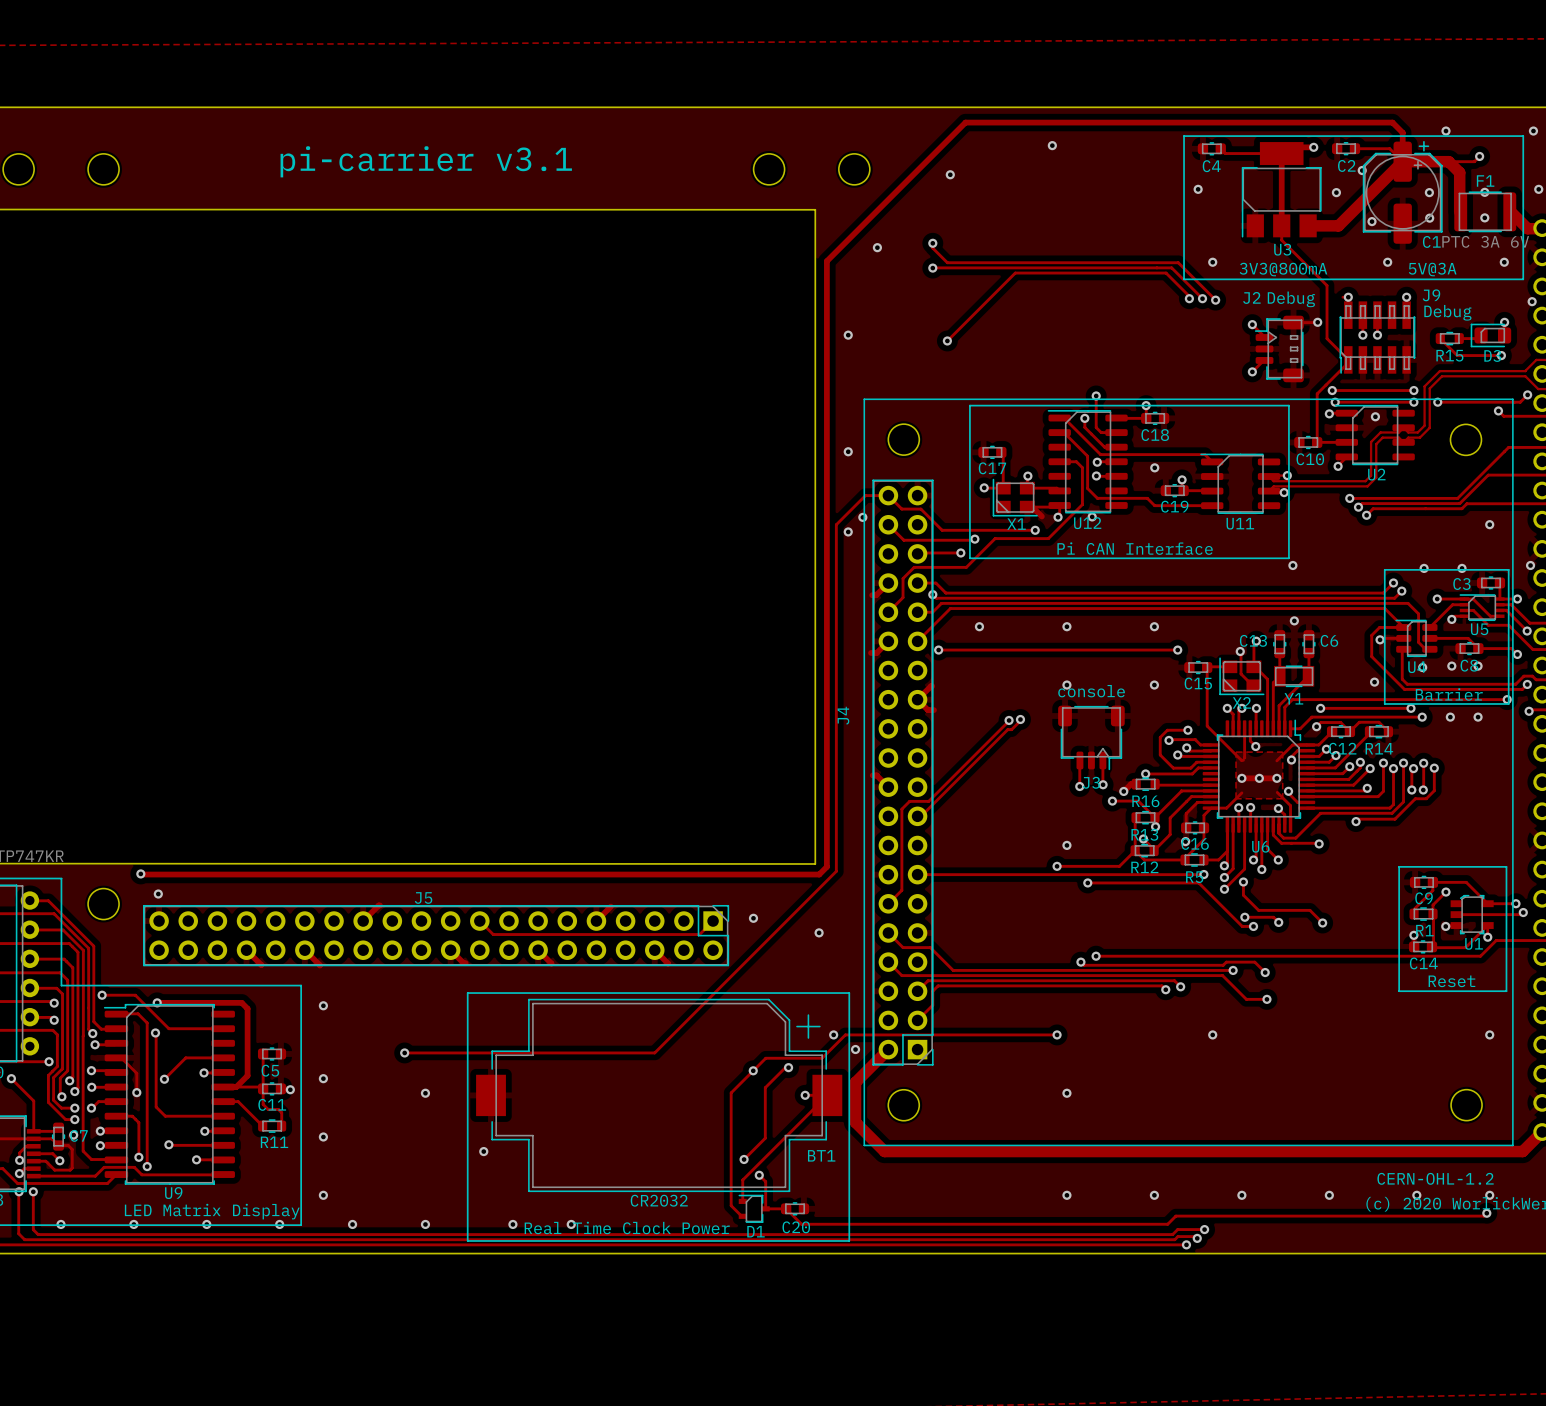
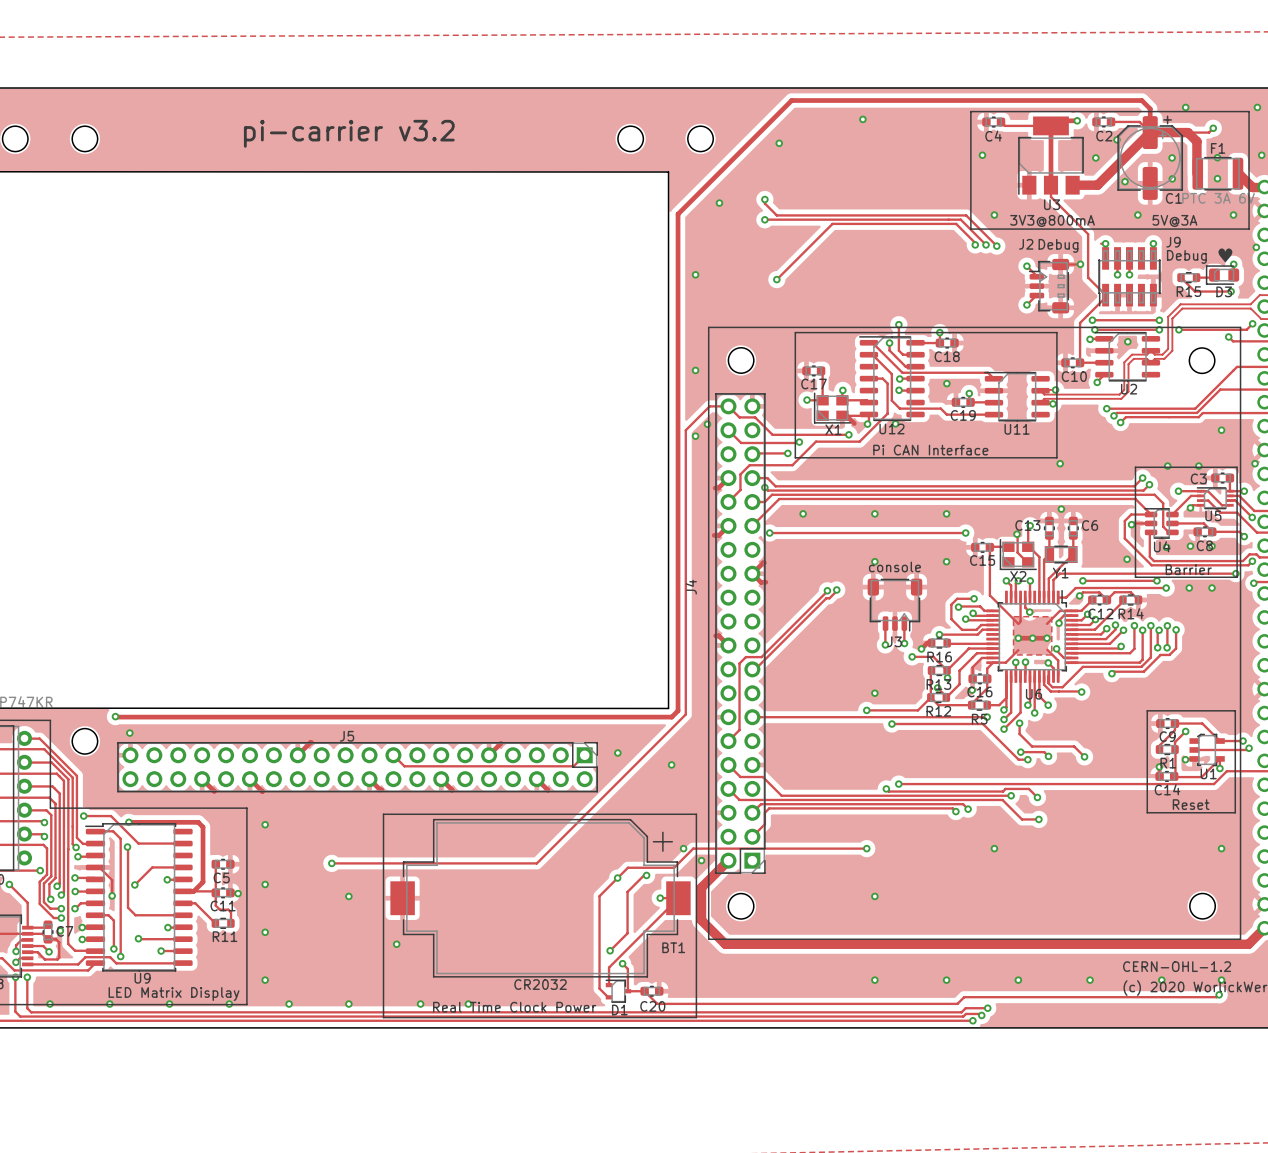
text: pi-carrier v3.1 (426, 161) -> pi-carrier v3.2 (349, 133)
text: none -> ♥ (1225, 255)

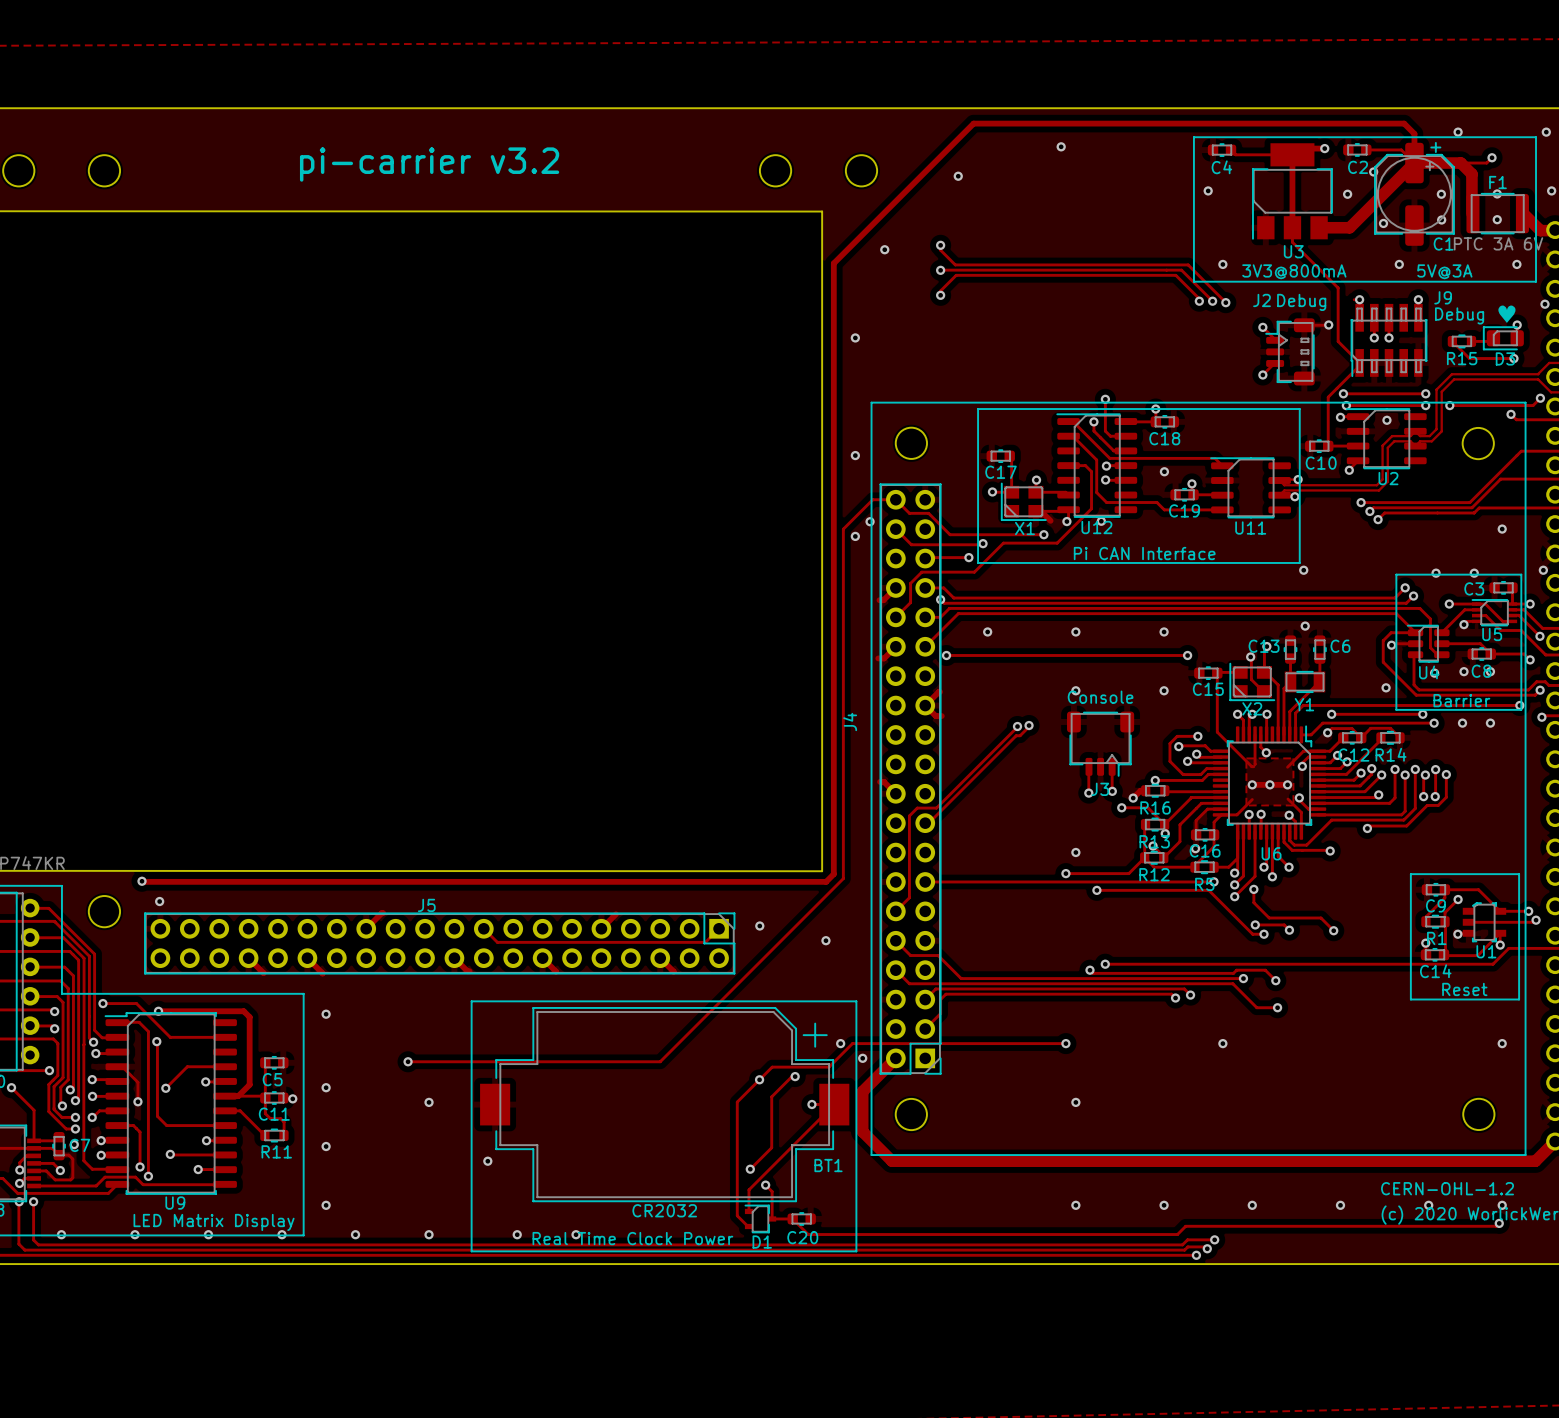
track: (832, 223) (776, 279) -> (1023, 275) (956, 275) (940, 290) (940, 295)
via position: (776, 279) -> (940, 295)
J3 value: console (894, 566) -> Console (1100, 697)

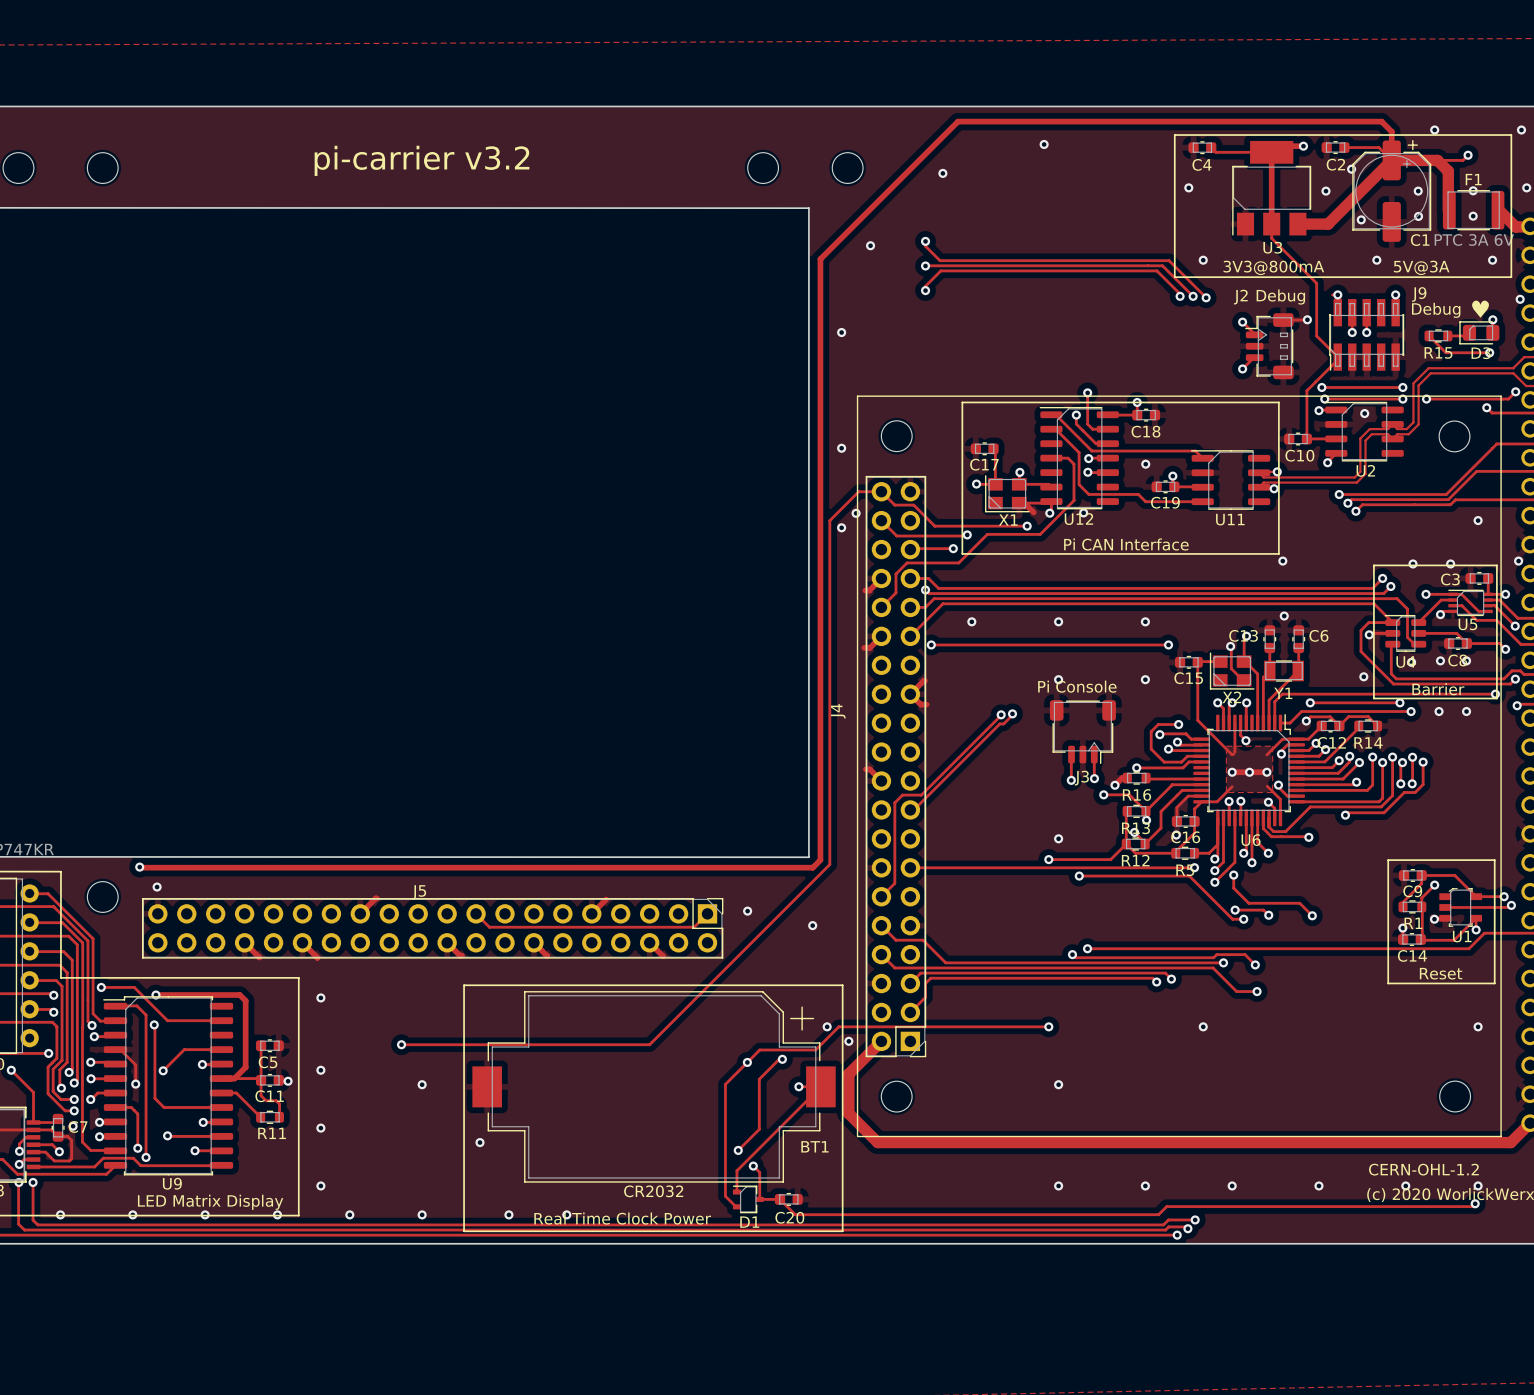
J3 value: Console (1100, 697) -> none
text: none -> Pi Console (1077, 686)

